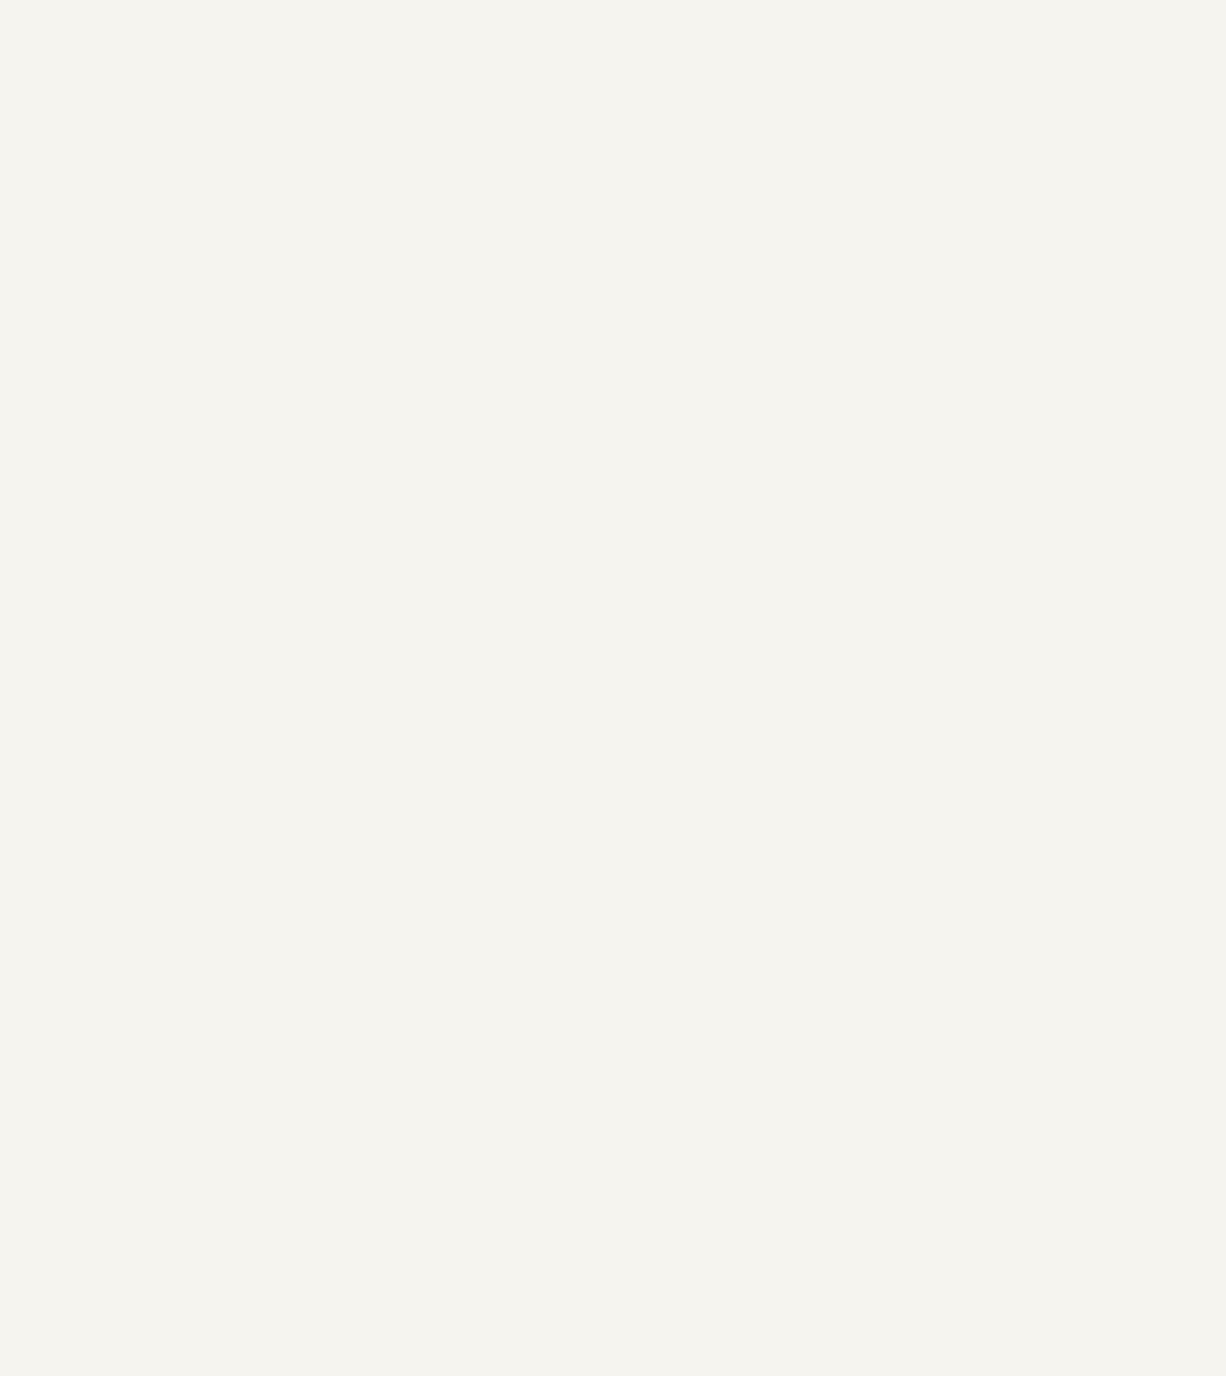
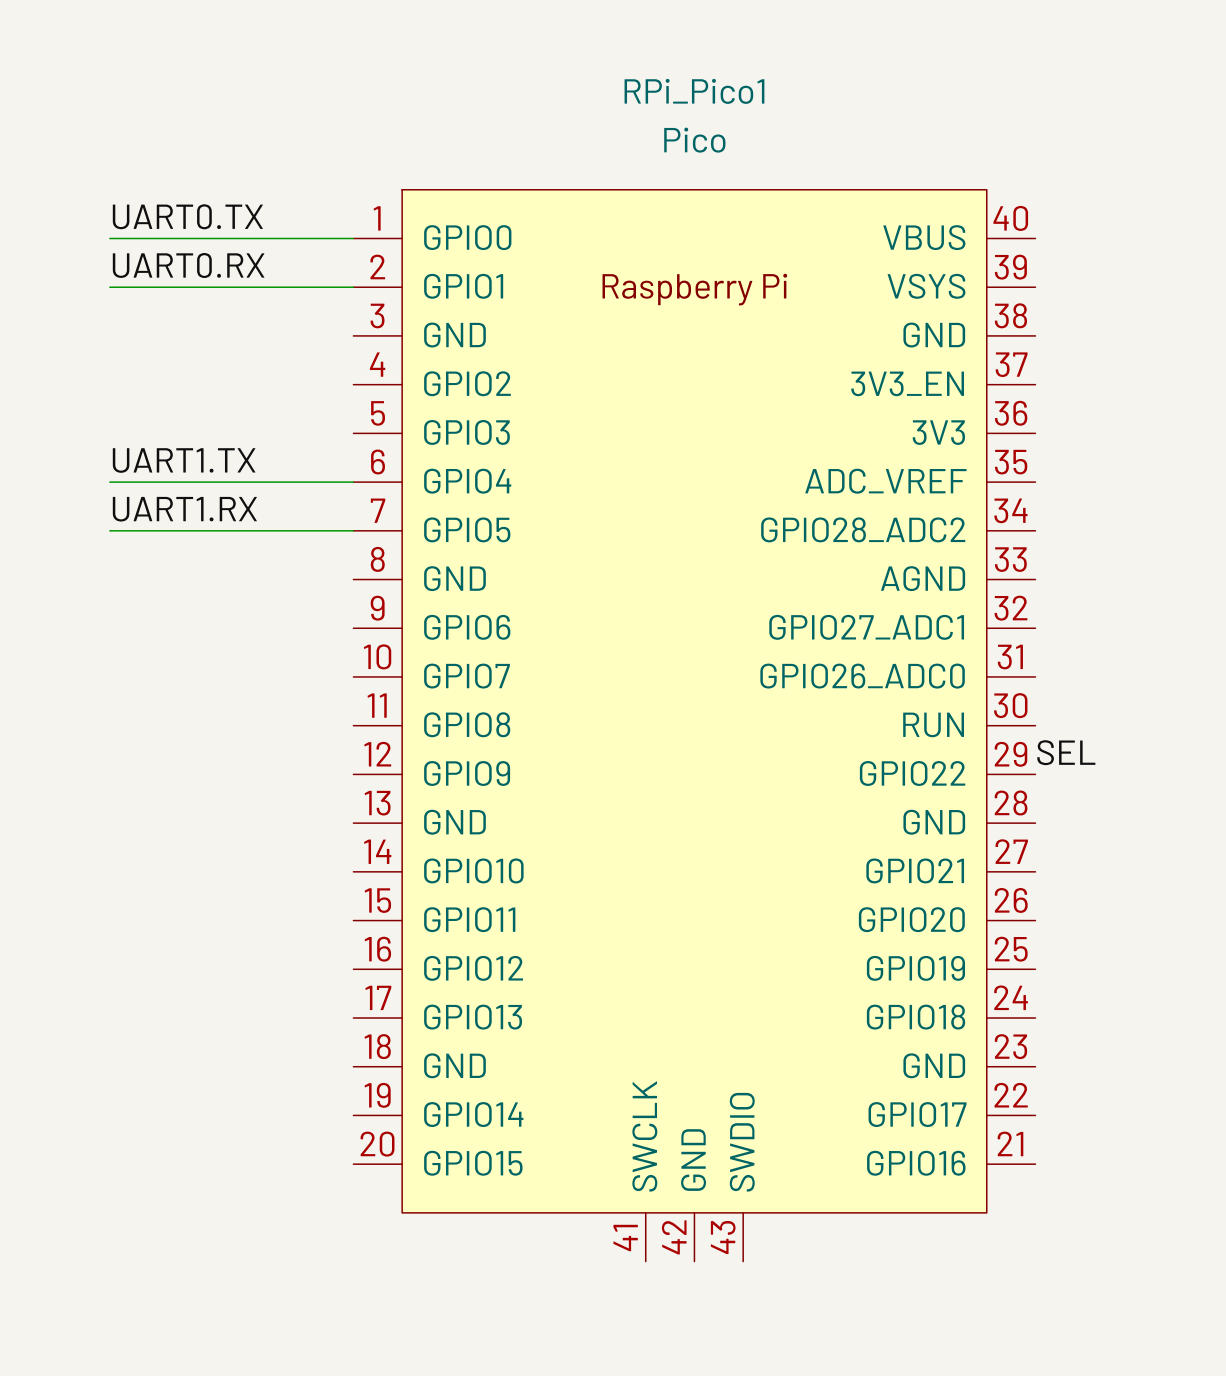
label: none -> UART0.TX (187, 216)
wire: none -> (109, 238) (353, 238)
label: none -> UART0.RX (188, 265)
wire: none -> (109, 287) (353, 287)
label: none -> UART1.TX (184, 460)
wire: none -> (109, 482) (353, 482)
label: none -> UART1.RX (184, 509)
wire: none -> (109, 530) (353, 530)
RPi_Pico1: none -> Pico (694, 725)
label: none -> SEL (1066, 752)

